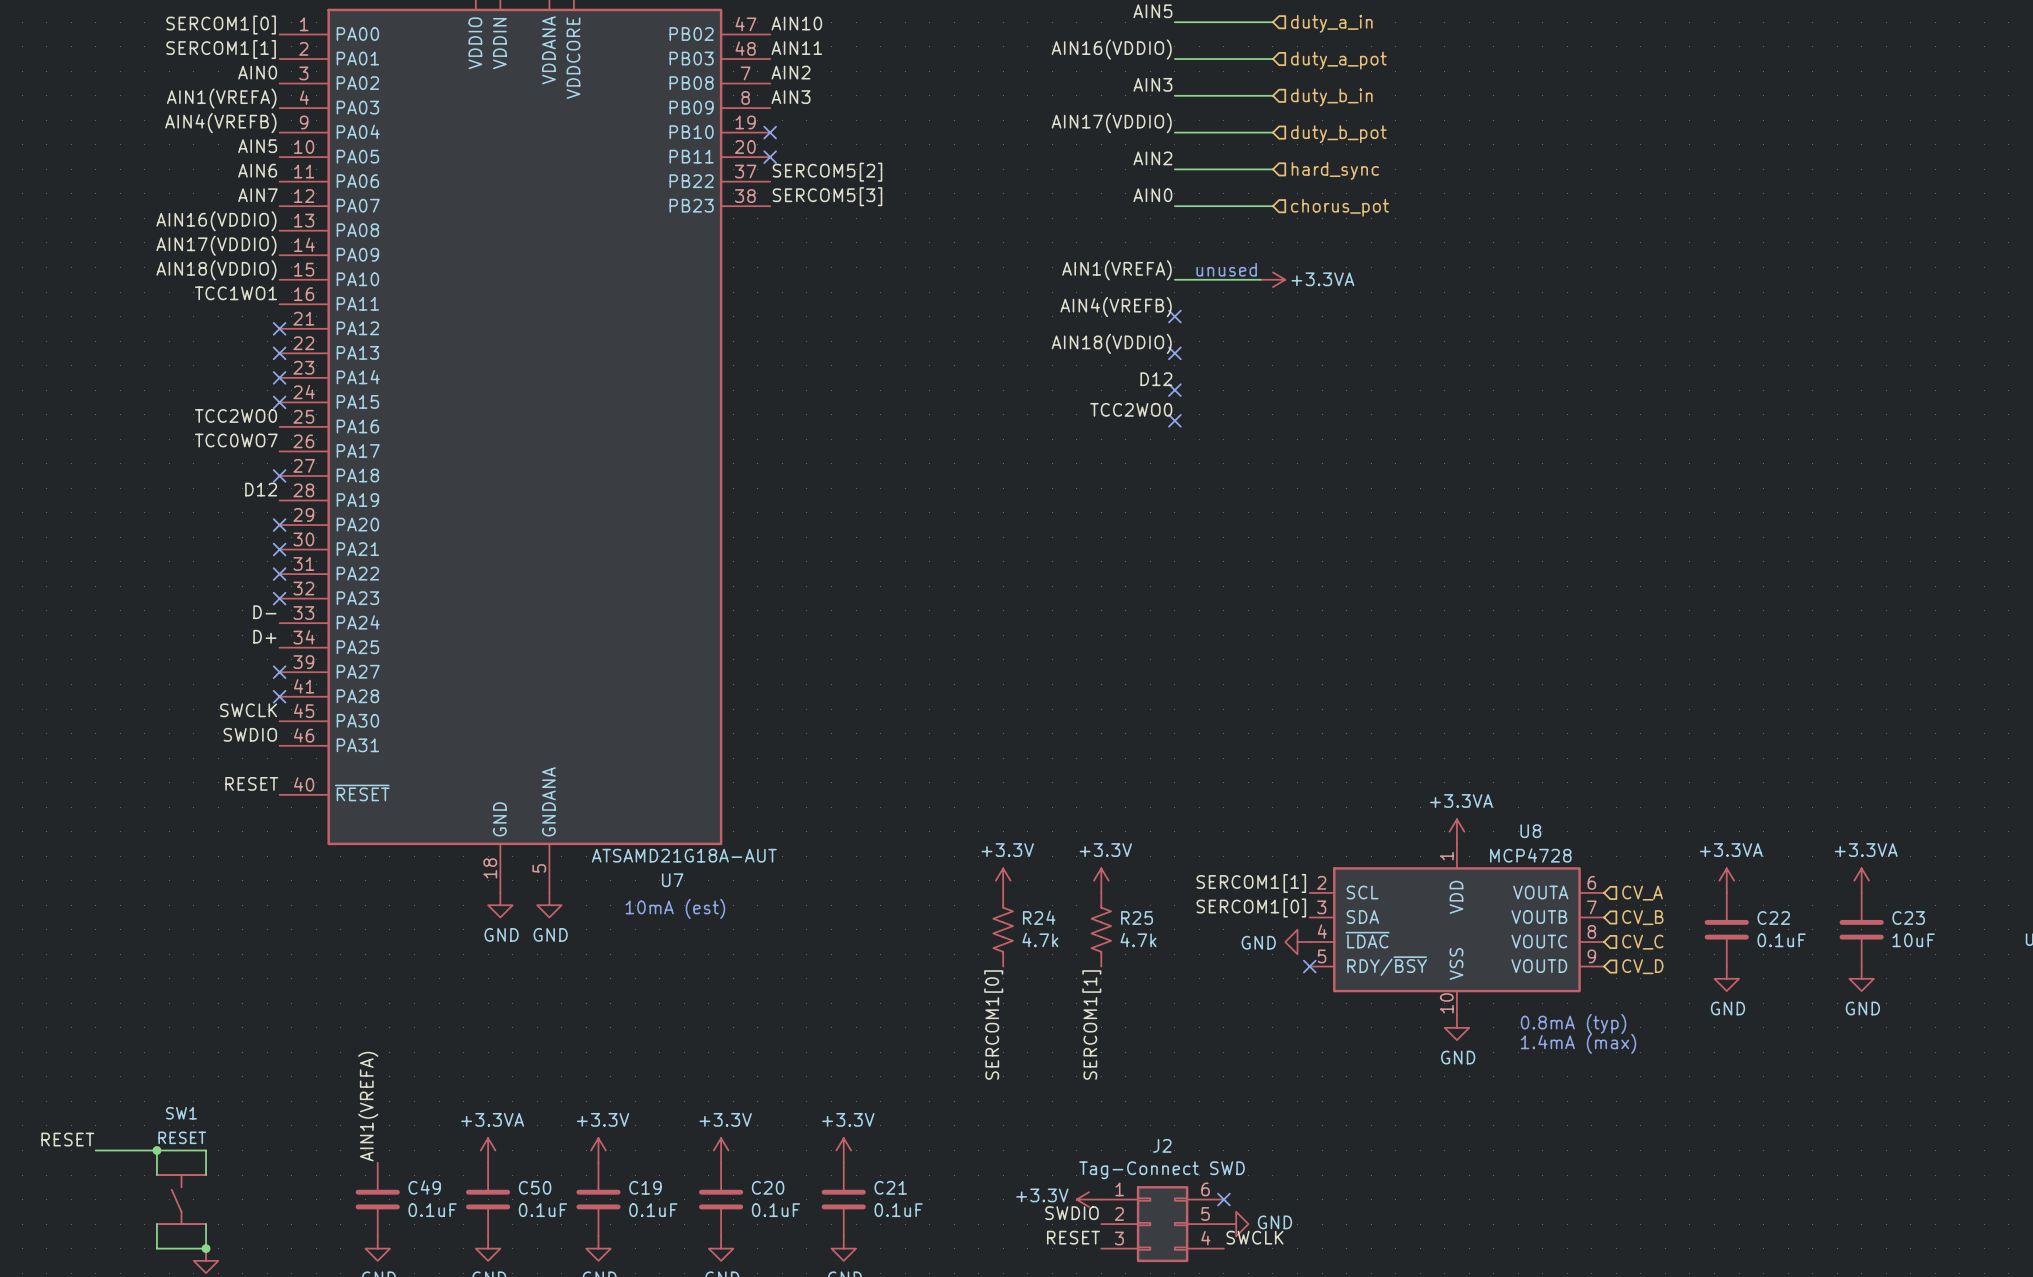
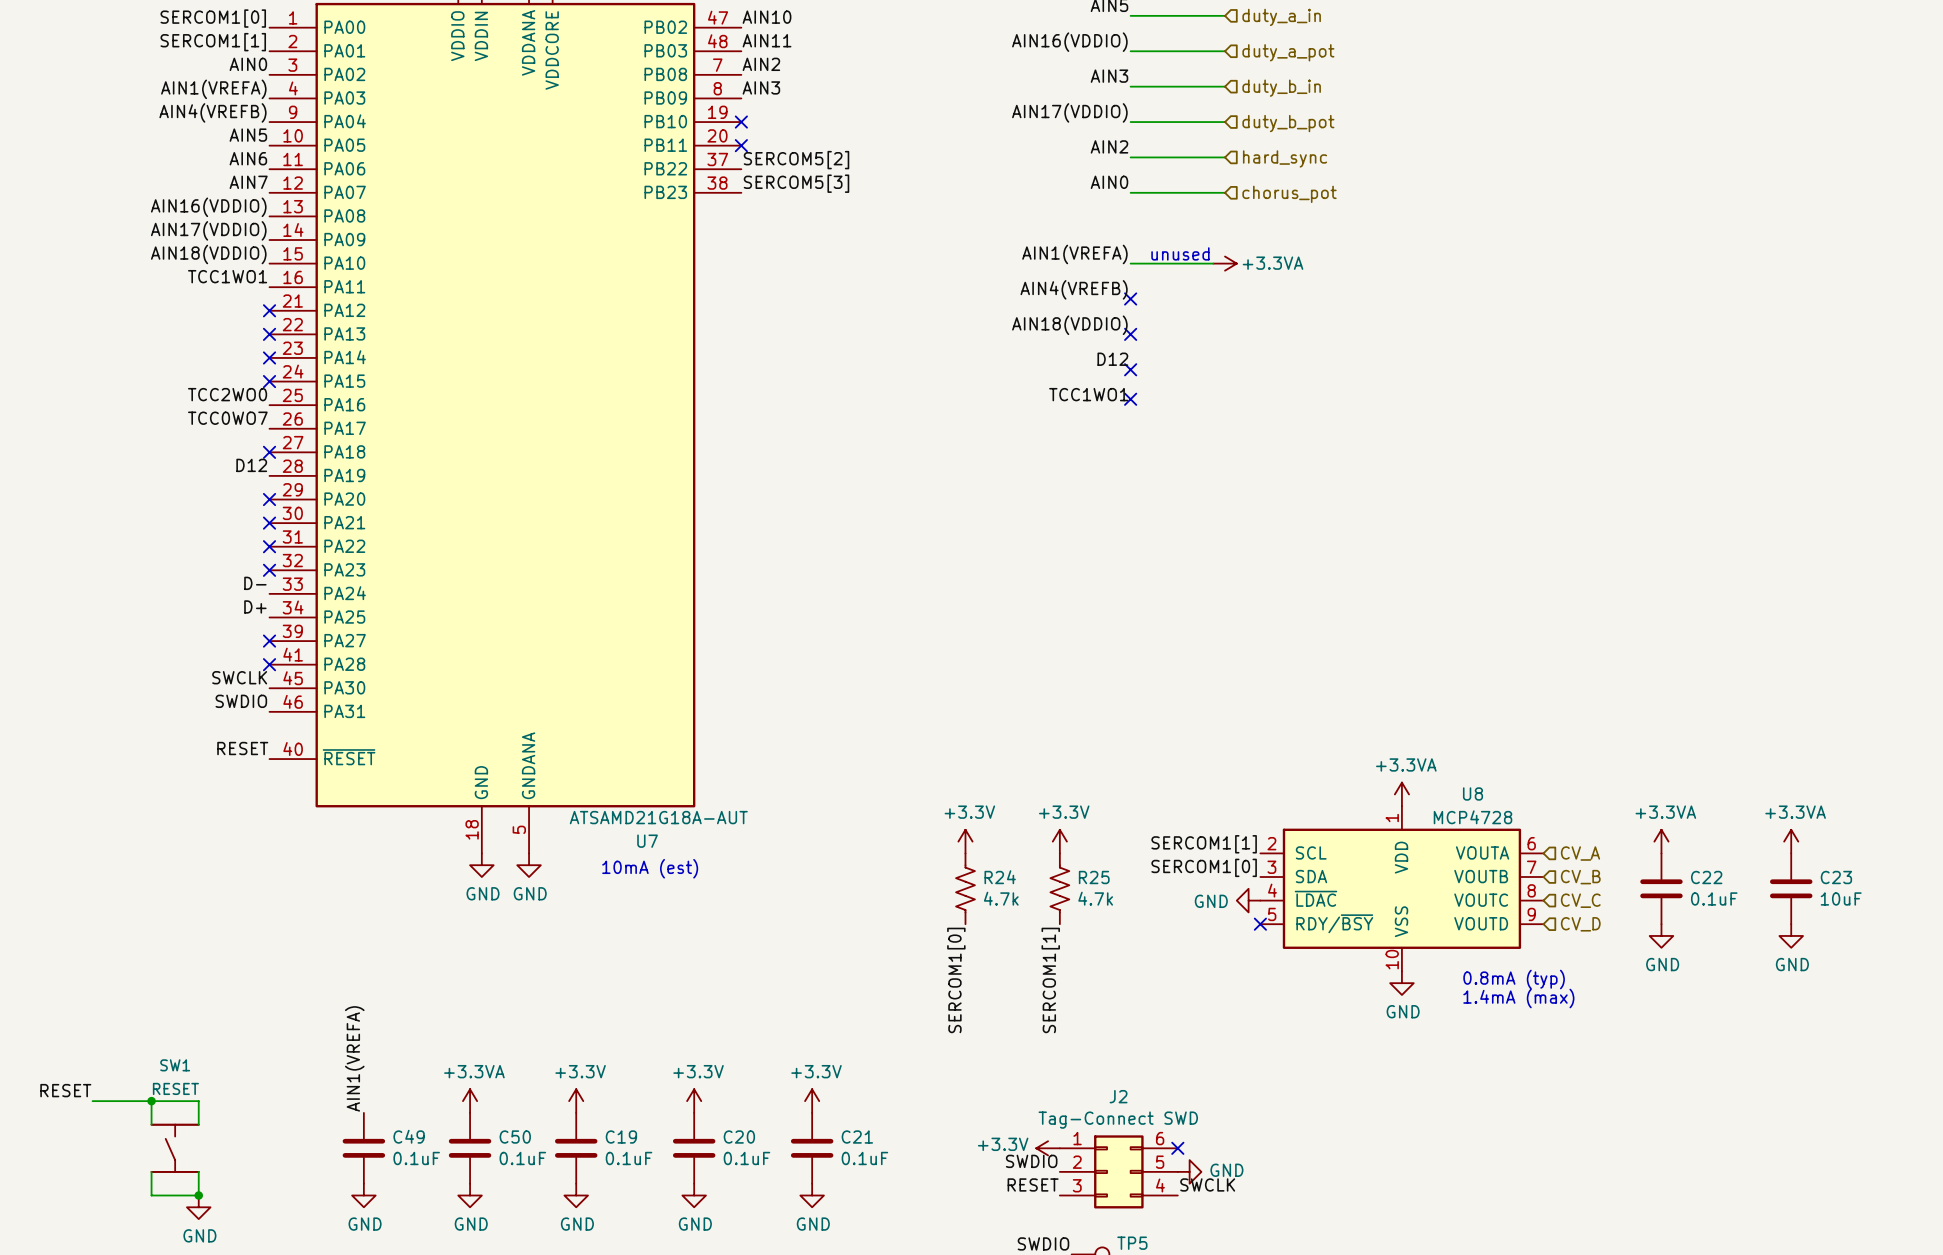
label: TCC2WO0 (1131, 409) -> TCC1WO1 (1088, 394)

